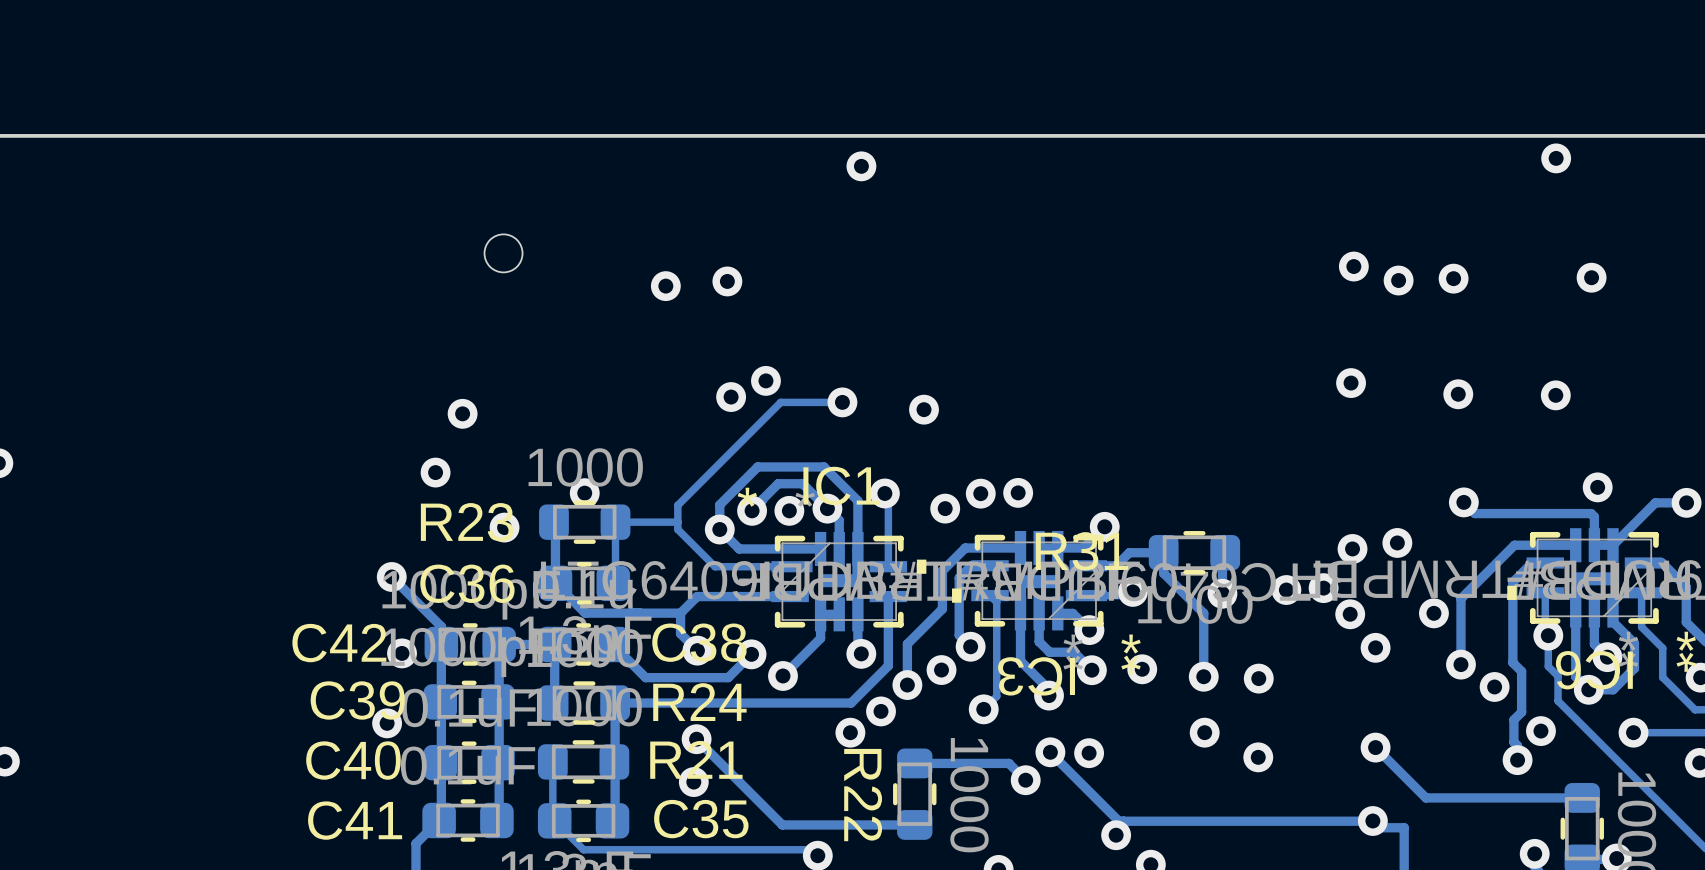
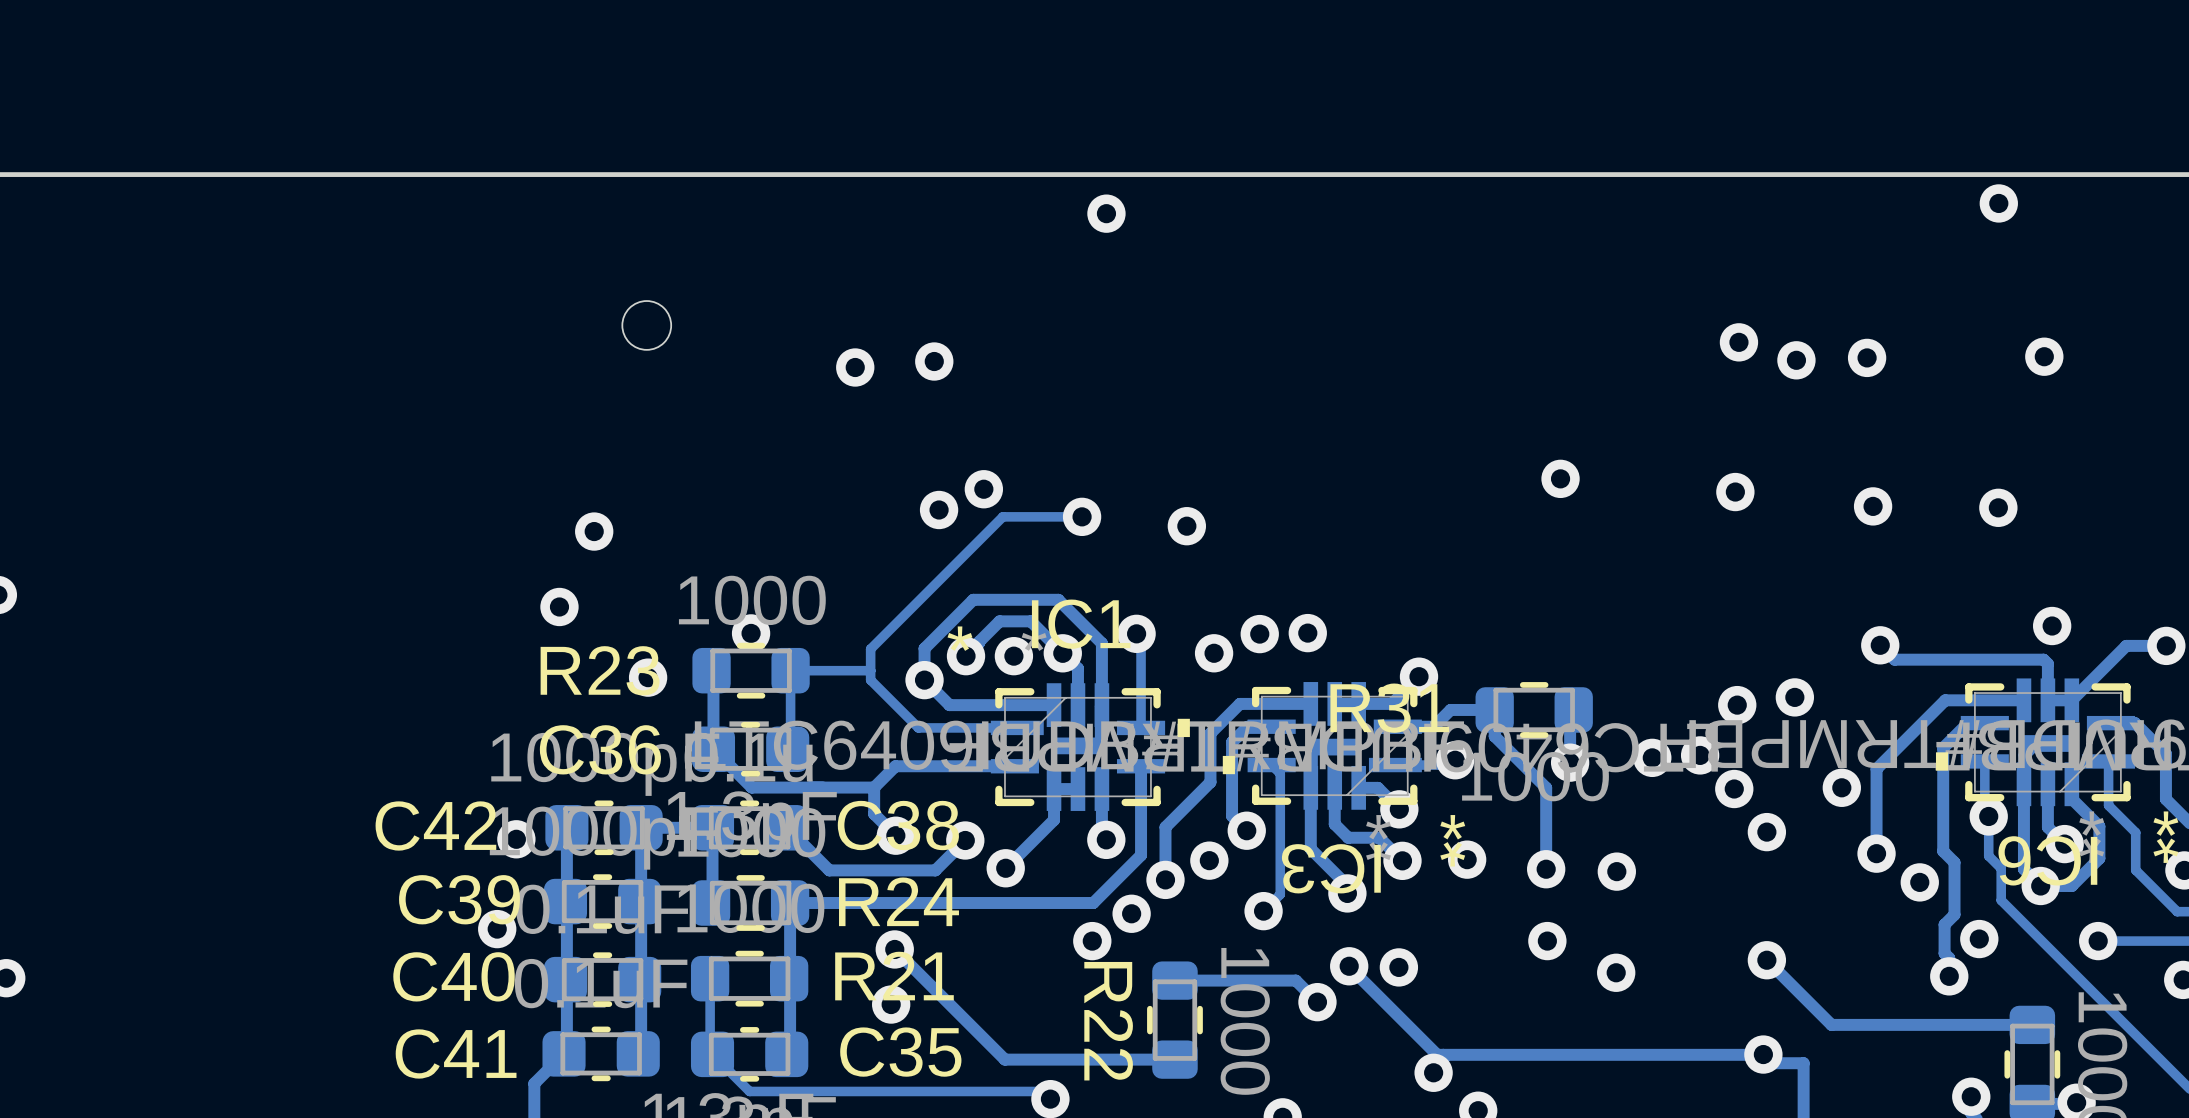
via: none -> (1560, 478)
track: (391, 576) (441, 626) (441, 644) -> none
via: (391, 576) -> none

